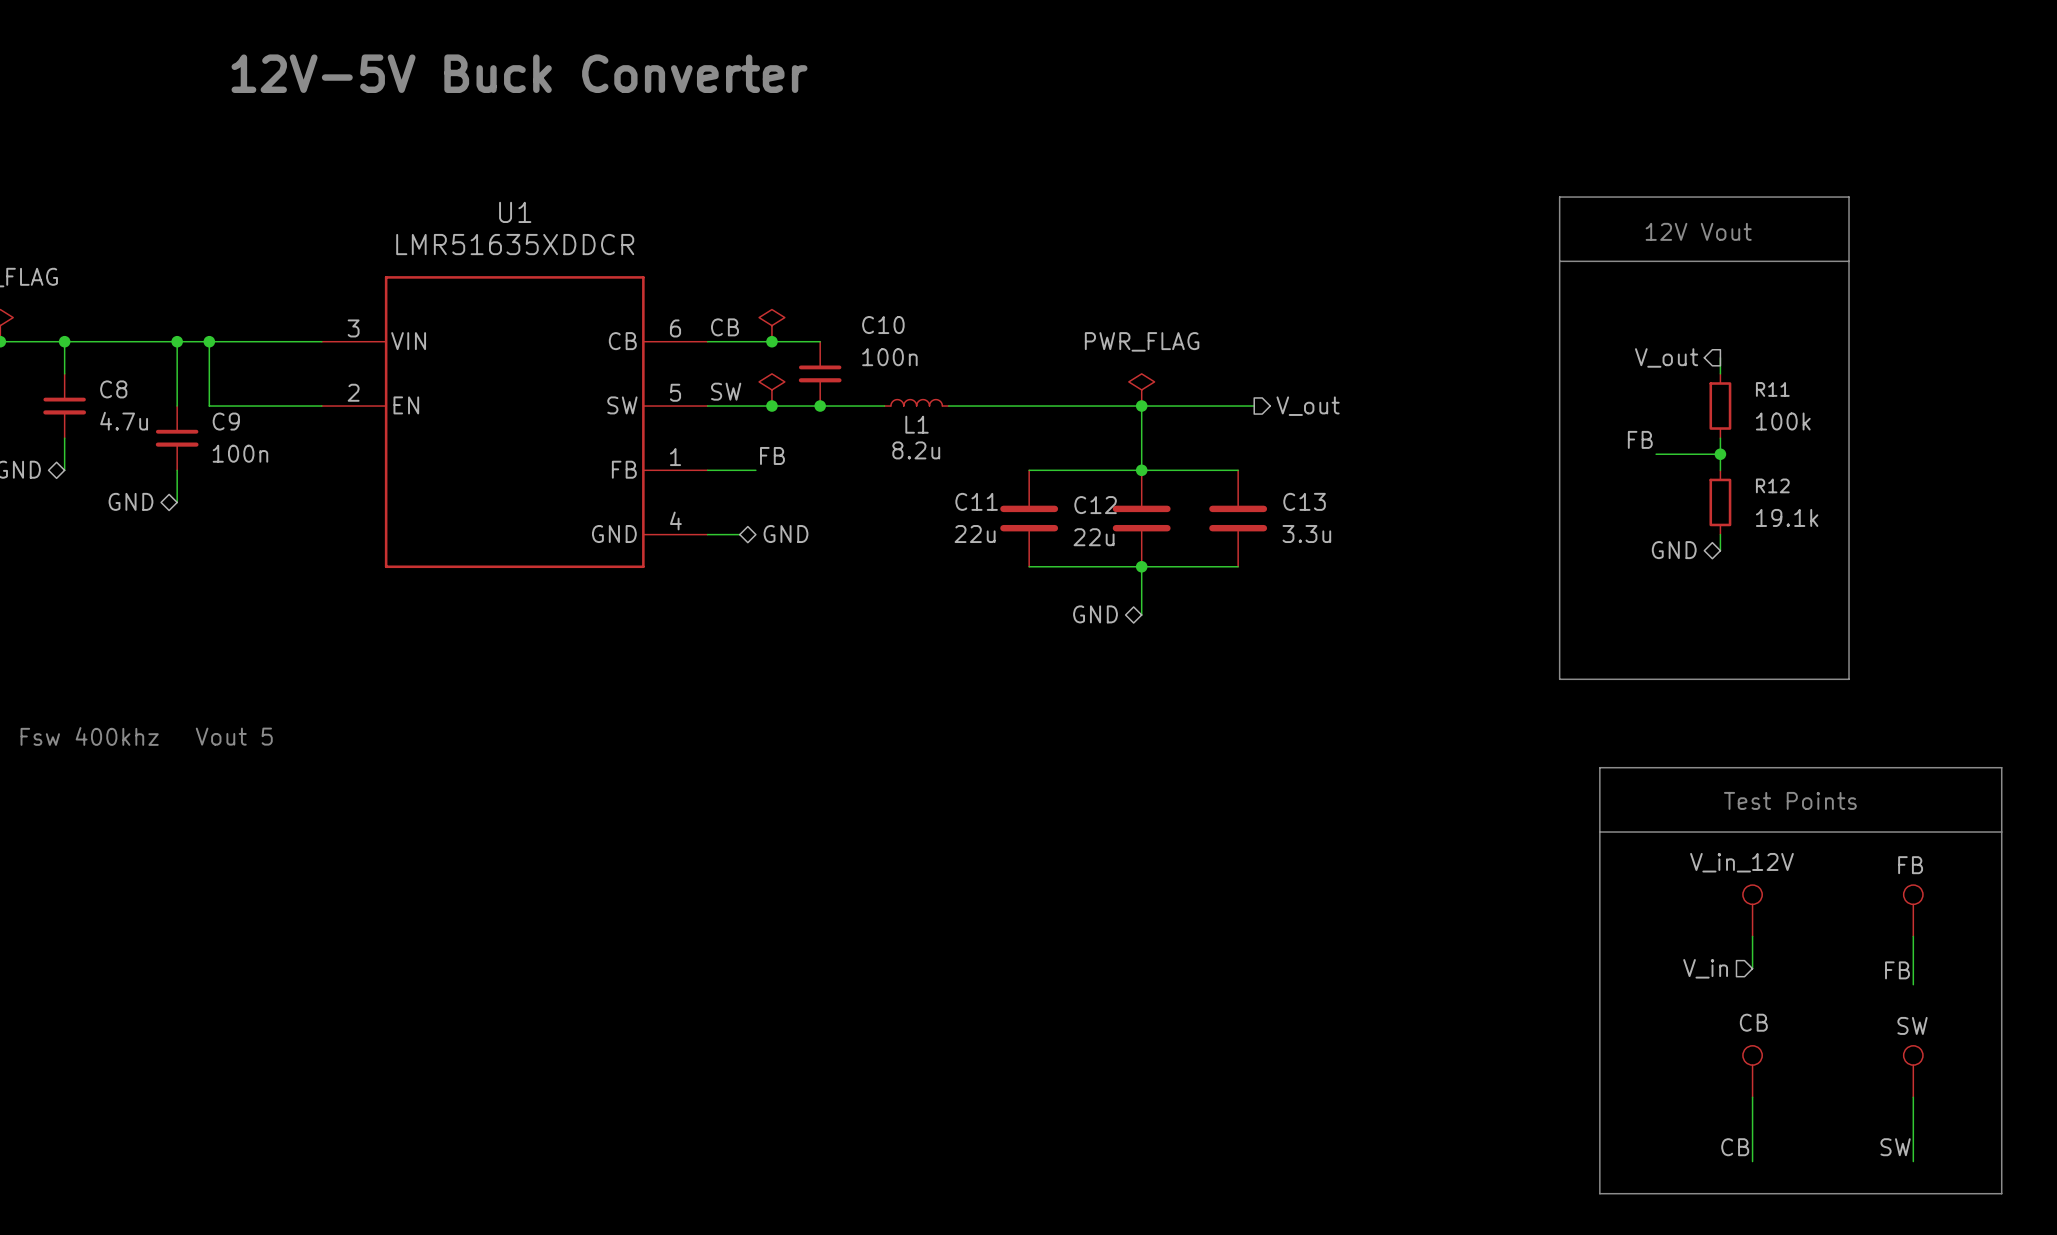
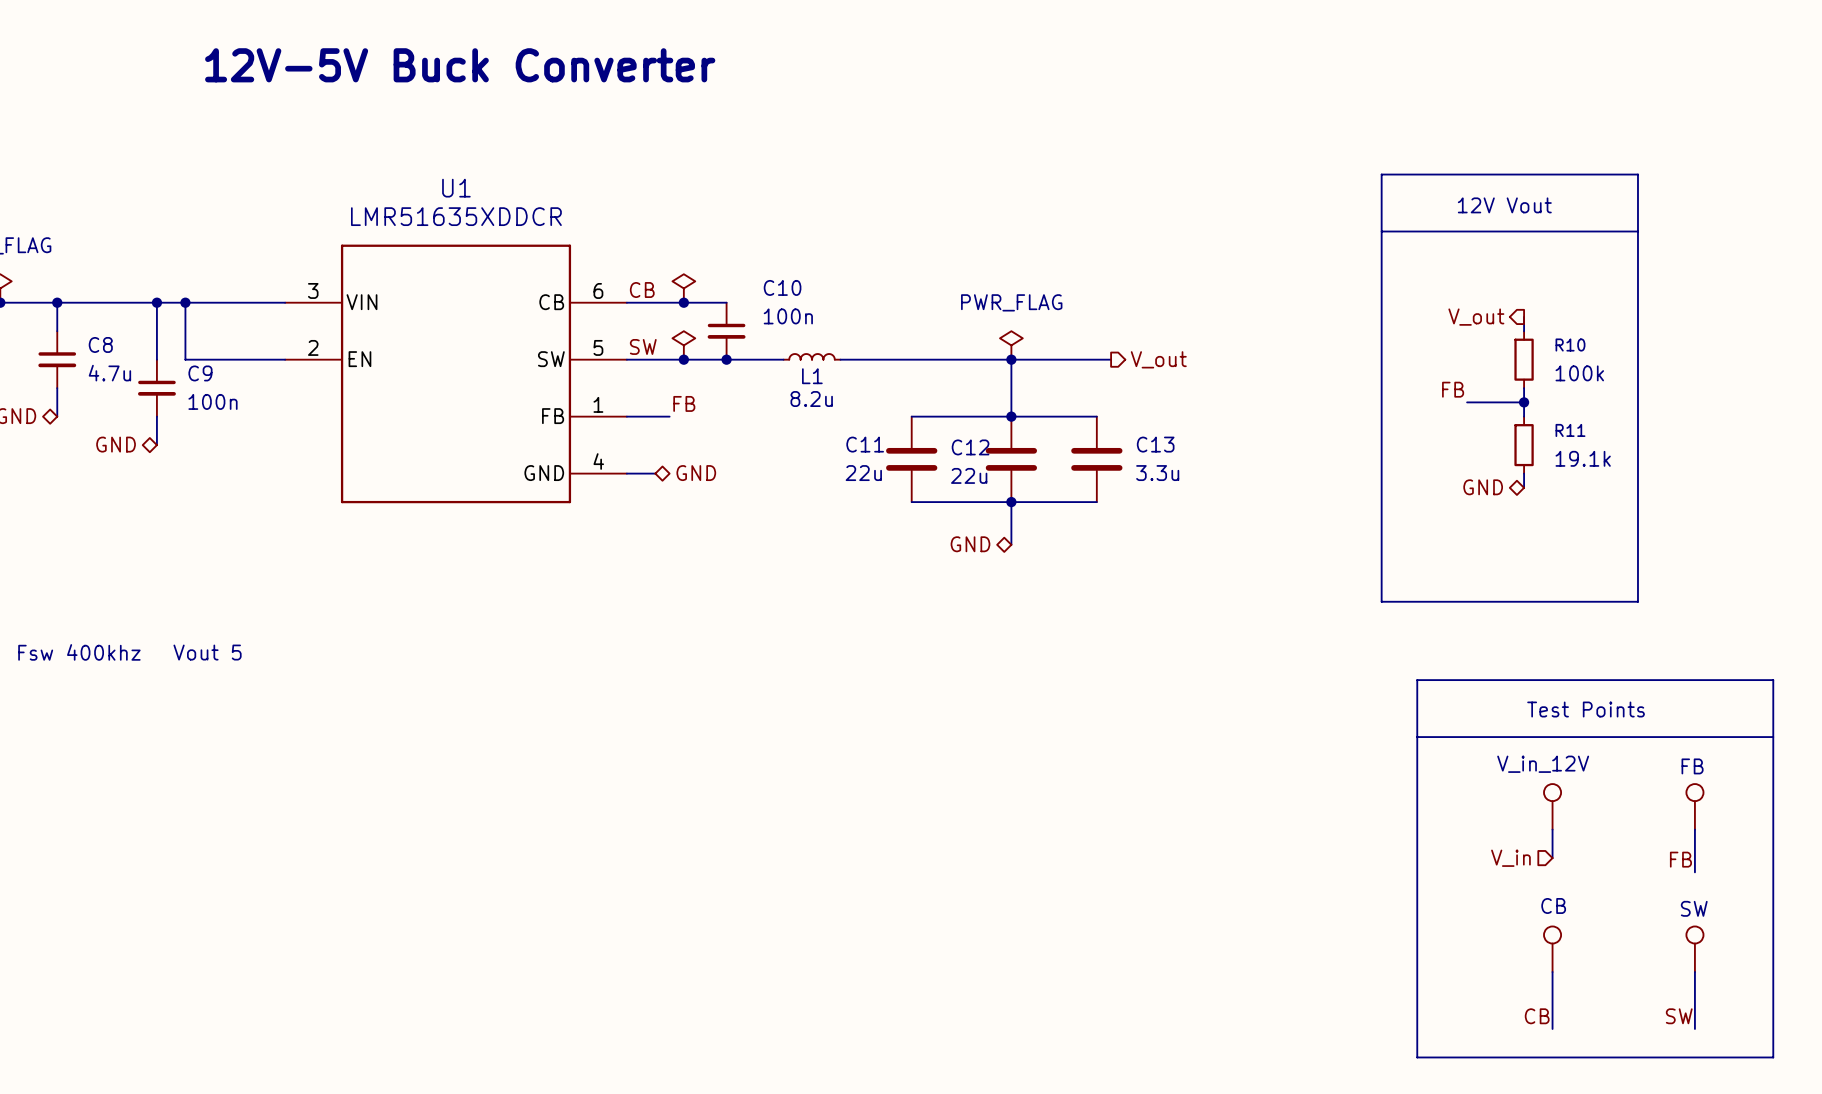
R11 name: R11 (1772, 389) -> R10 (1570, 345)
R12 name: R12 (1772, 485) -> R11 (1570, 430)

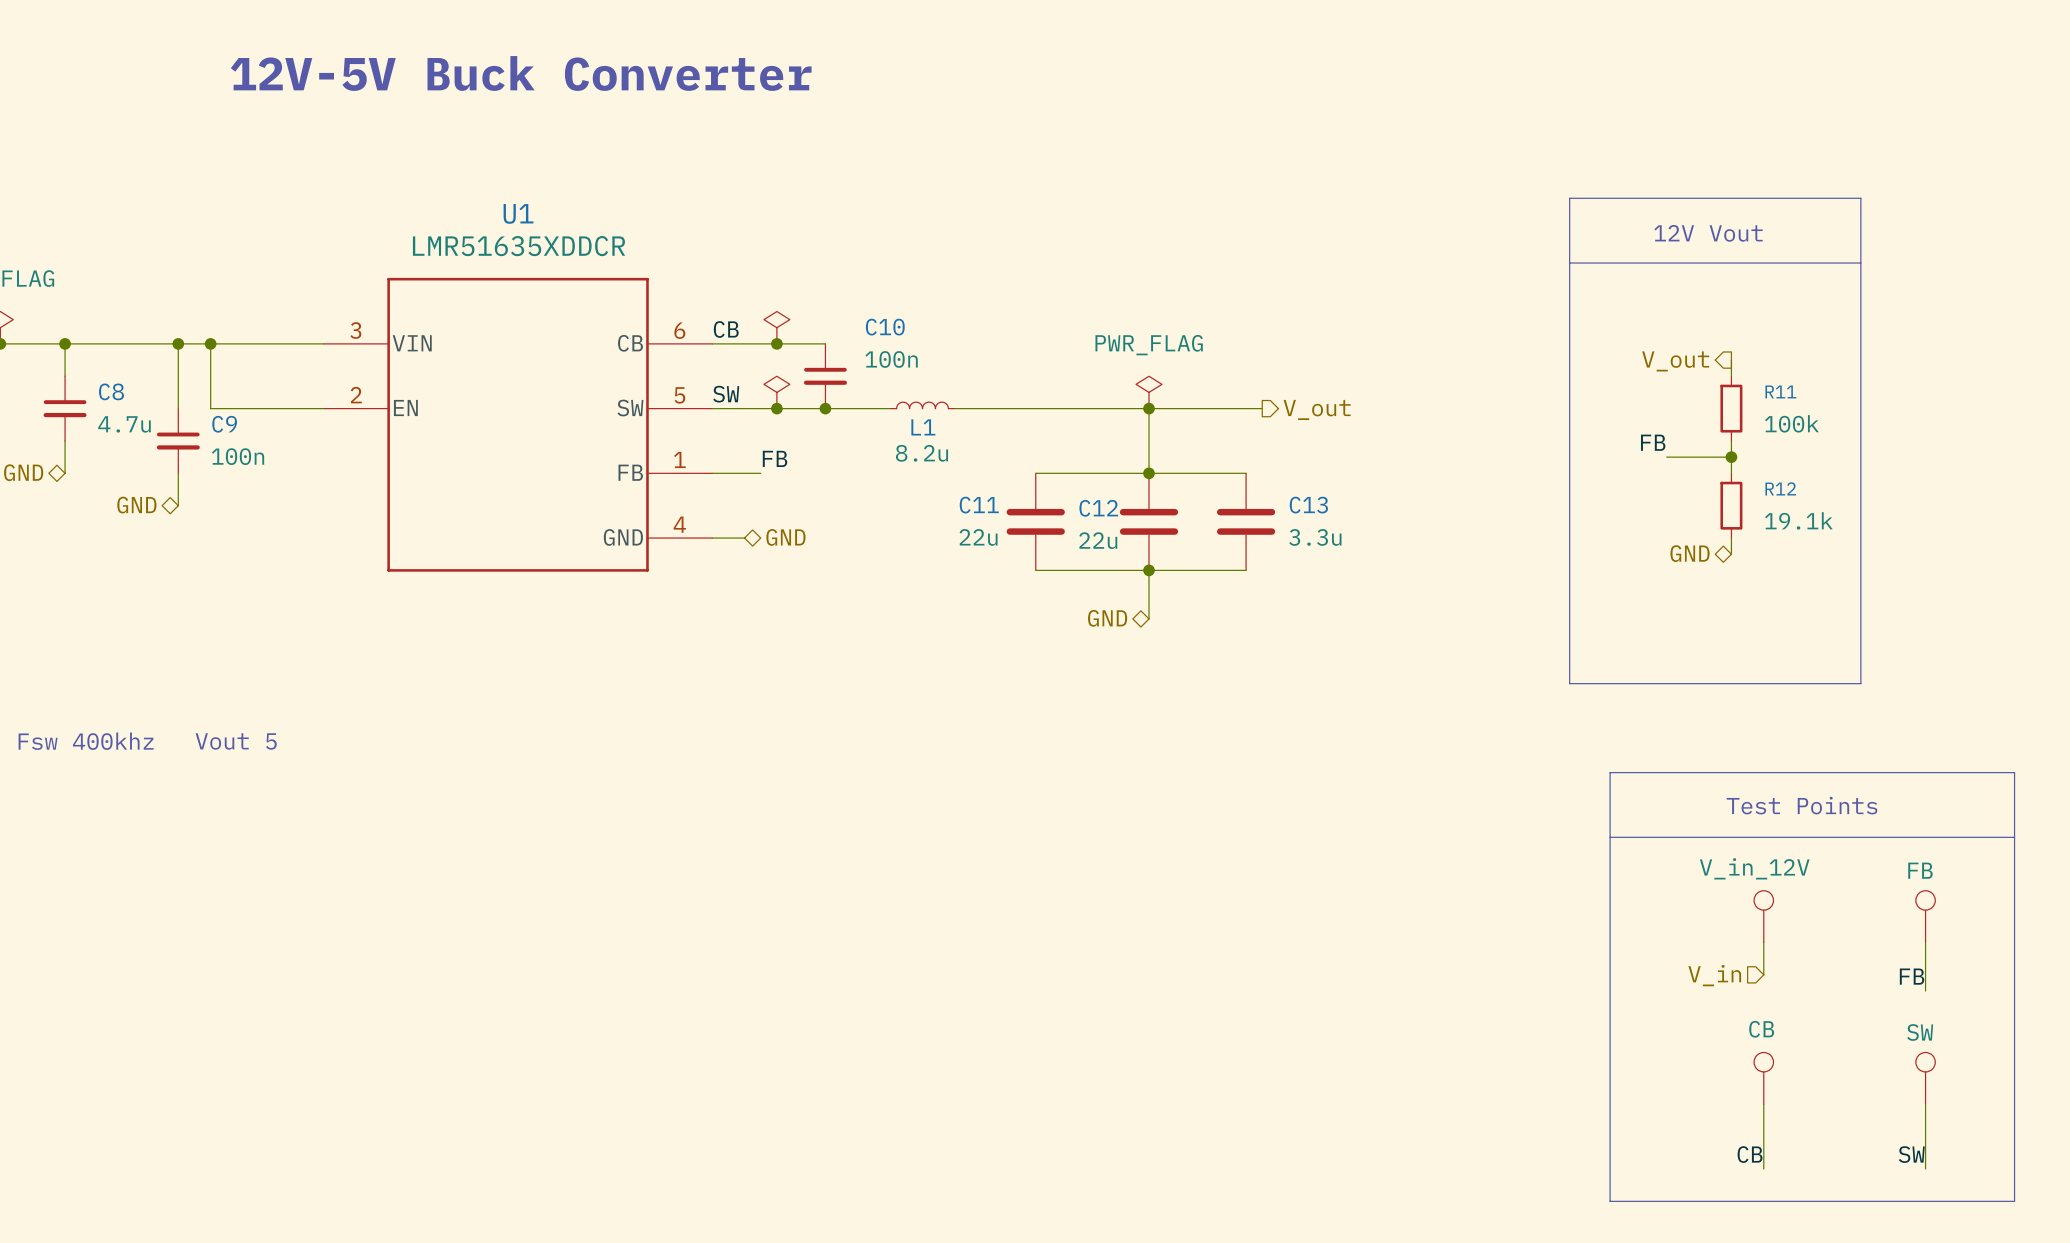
R10 name: R10 (1570, 345) -> R11 (1780, 391)
R11 name: R11 (1570, 430) -> R12 (1780, 488)

